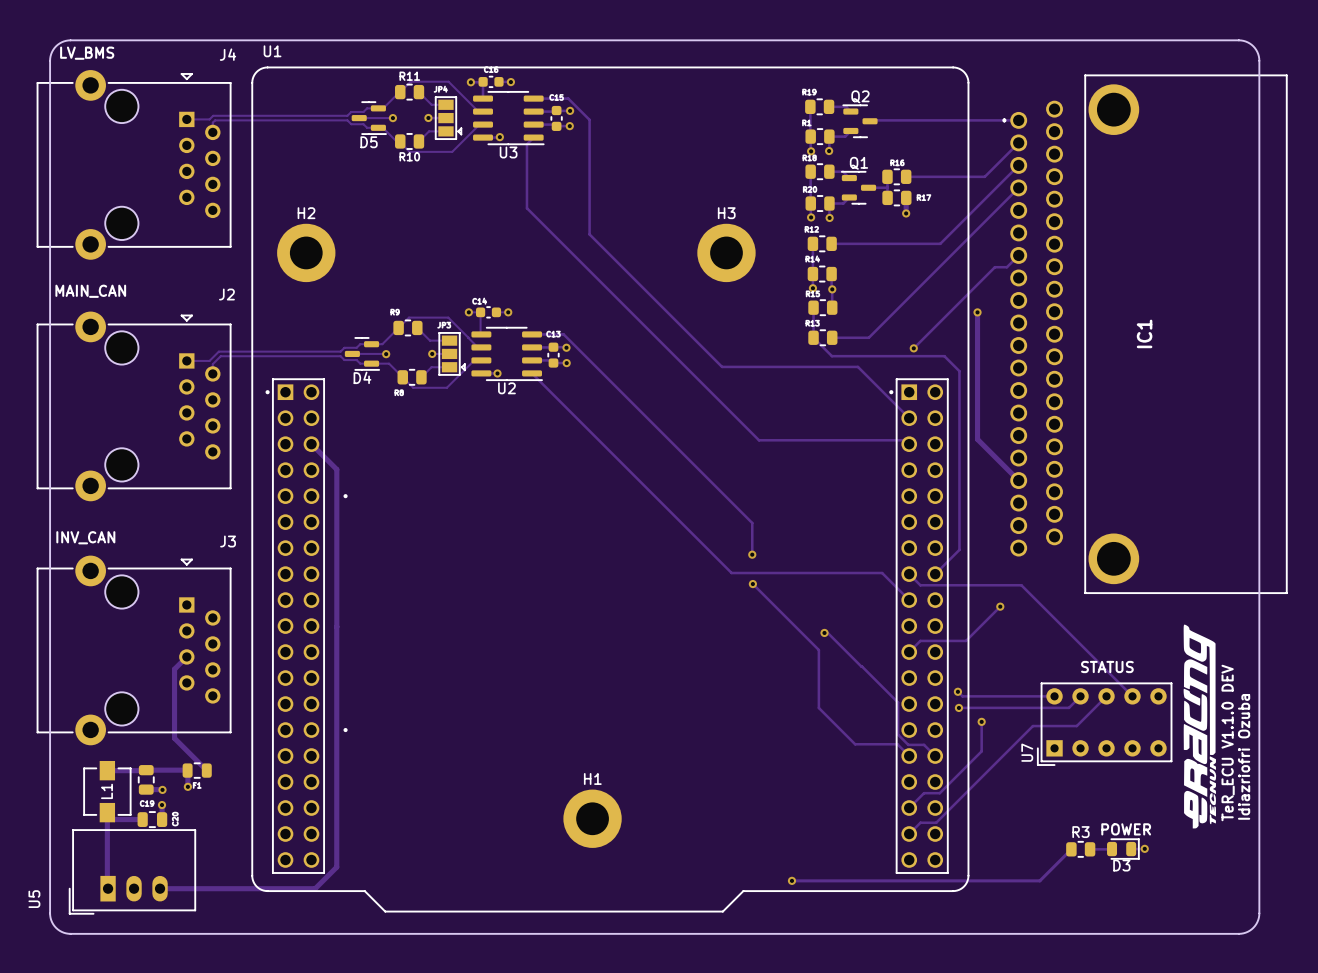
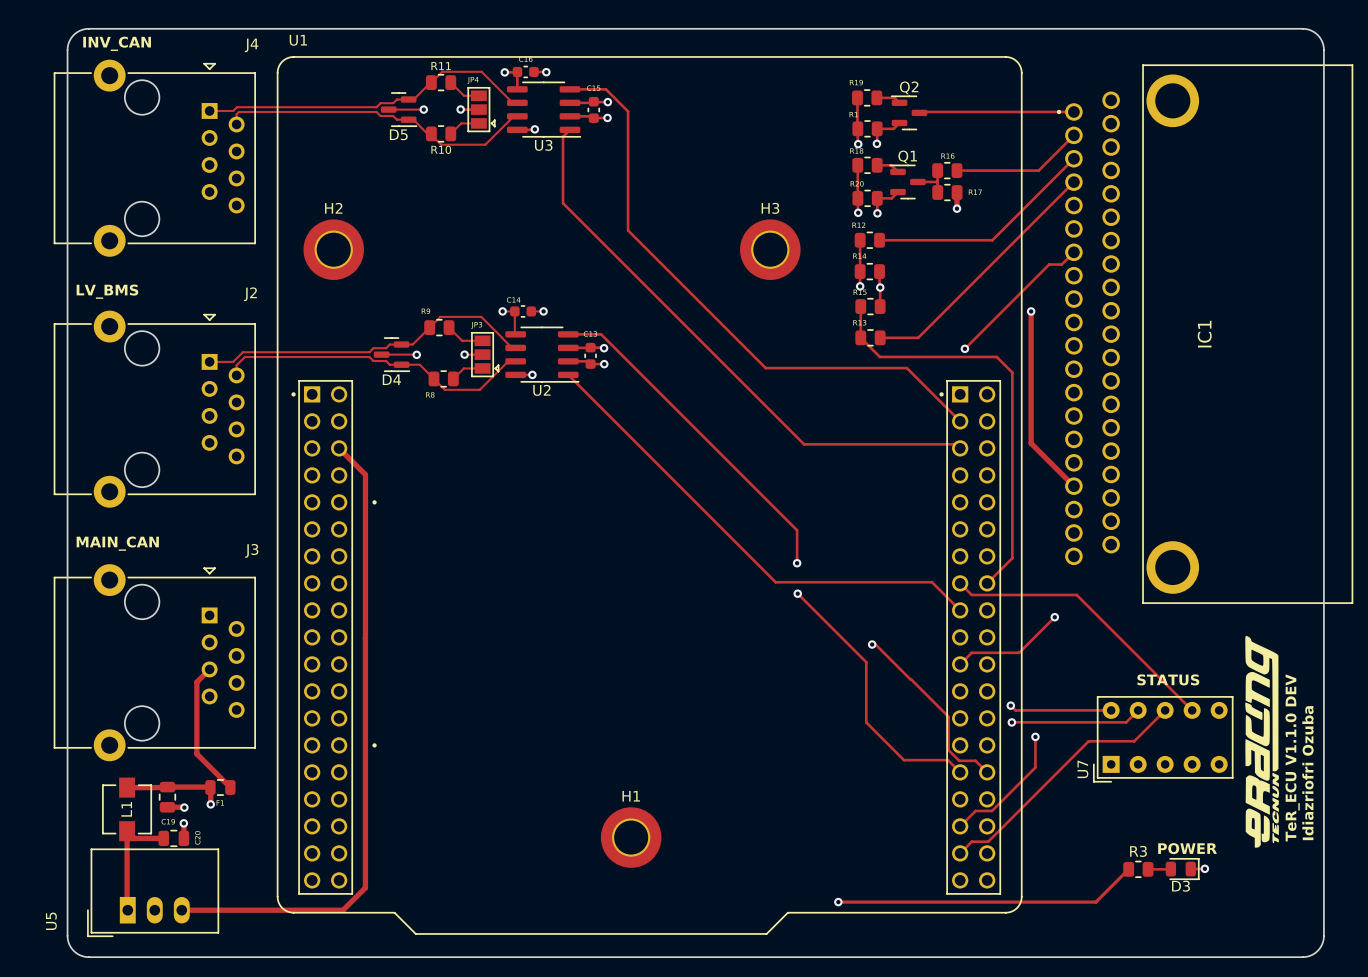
text position: LV_BMS (87, 53) -> LV_BMS (107, 291)
text: none -> INV_CAN (117, 43)
text position: MAIN_CAN (90, 291) -> MAIN_CAN (117, 543)
text: INV_CAN (85, 537) -> none

